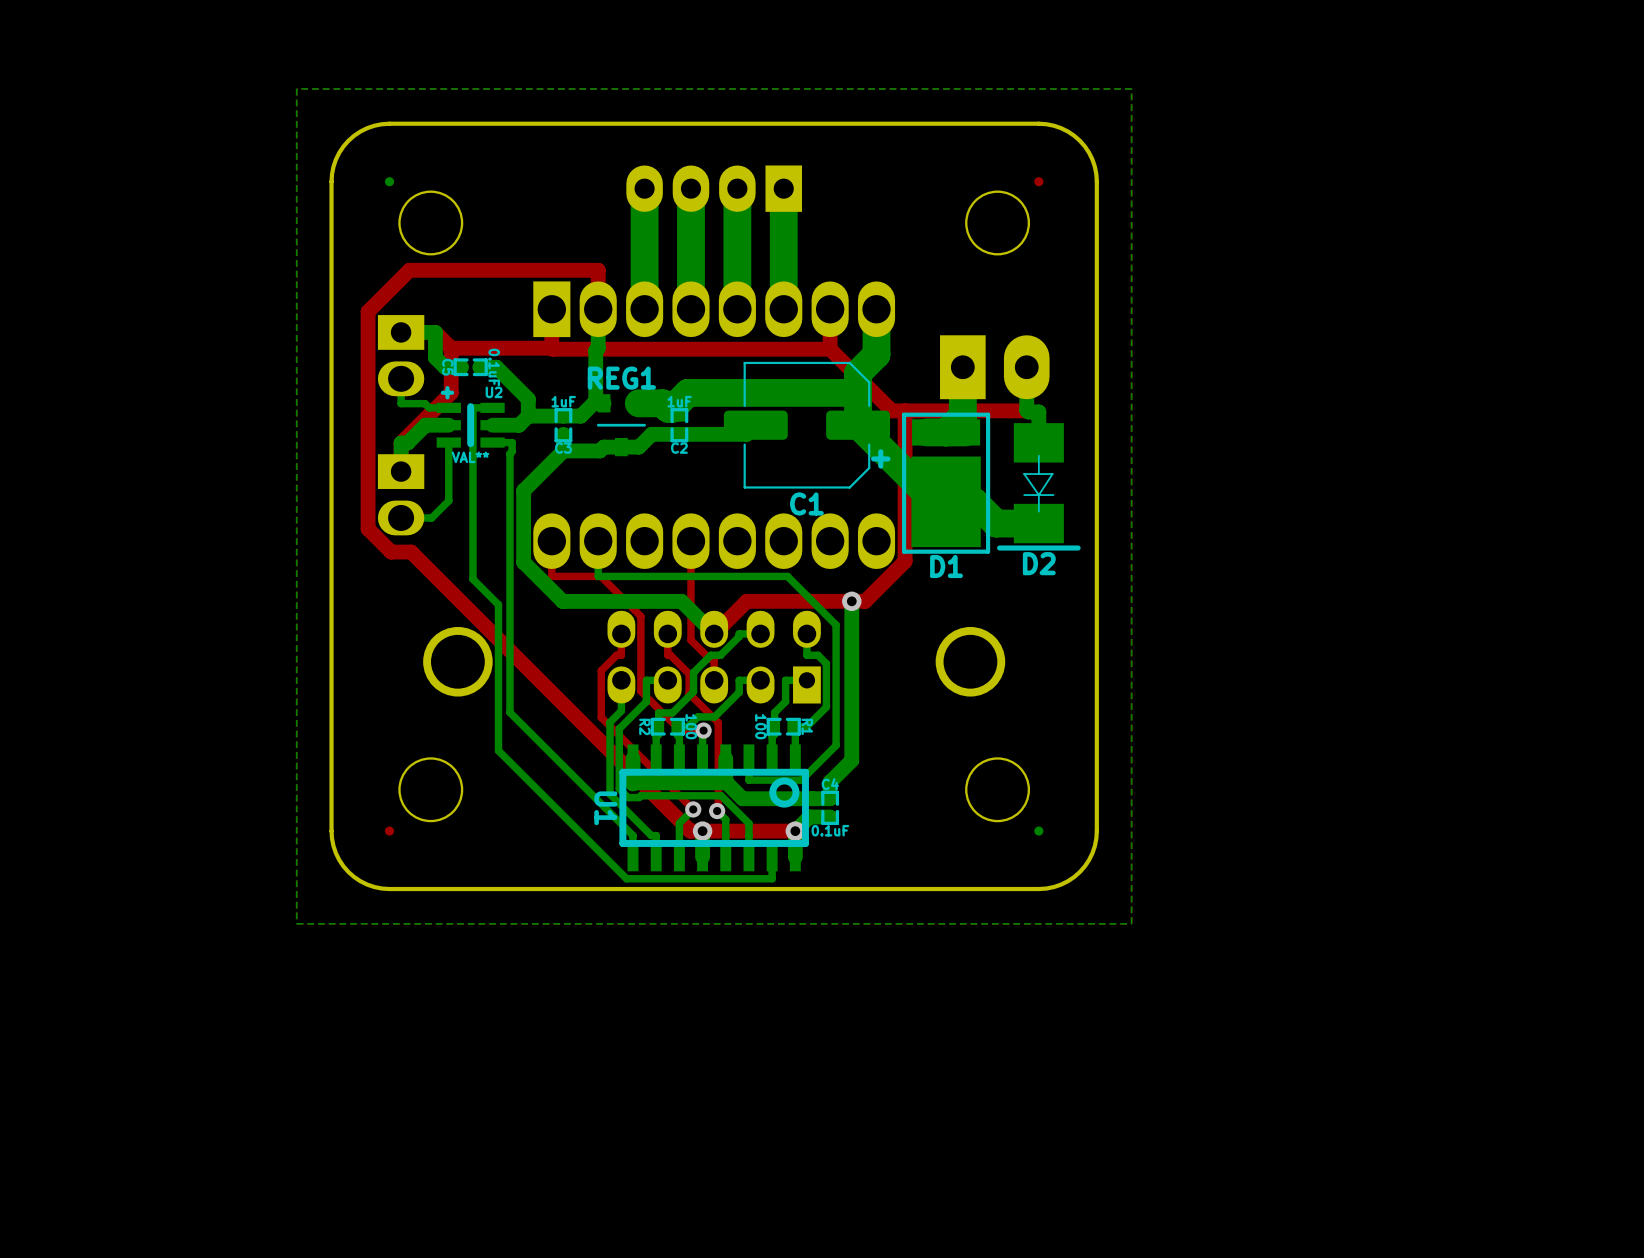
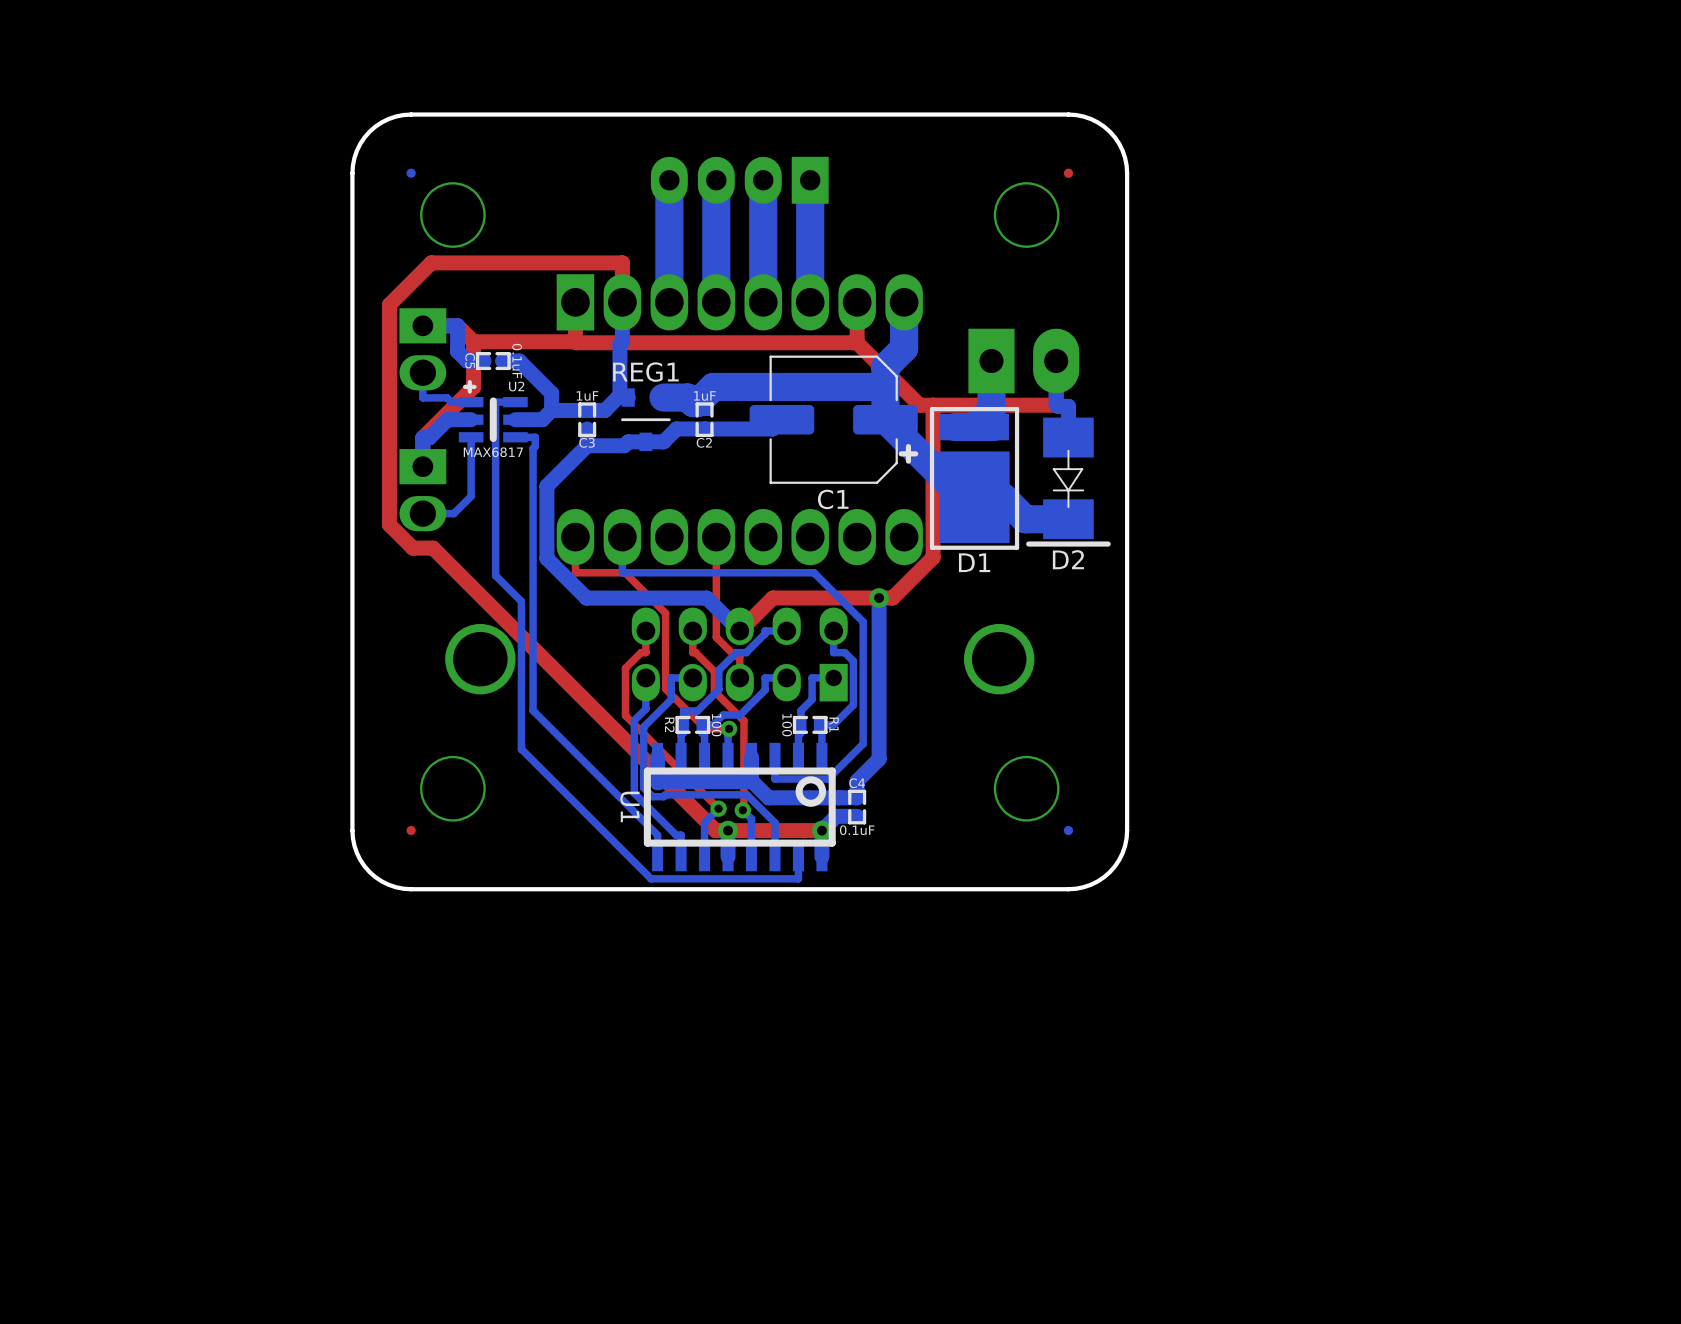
bottom zone outline: (1131, 88) (1131, 923) (296, 923) (296, 88) (1131, 88) -> none
U2 value: VAL** (470, 457) -> MAX6817 (493, 452)

